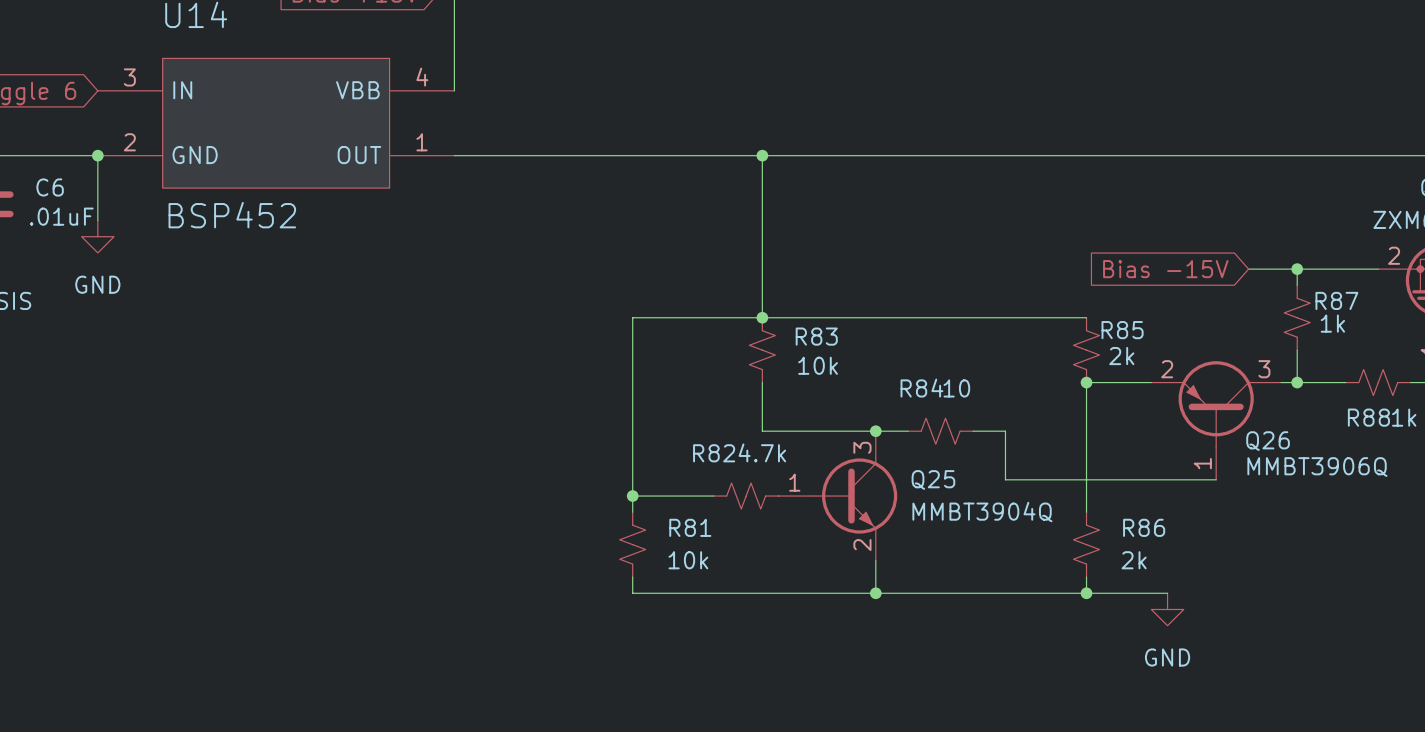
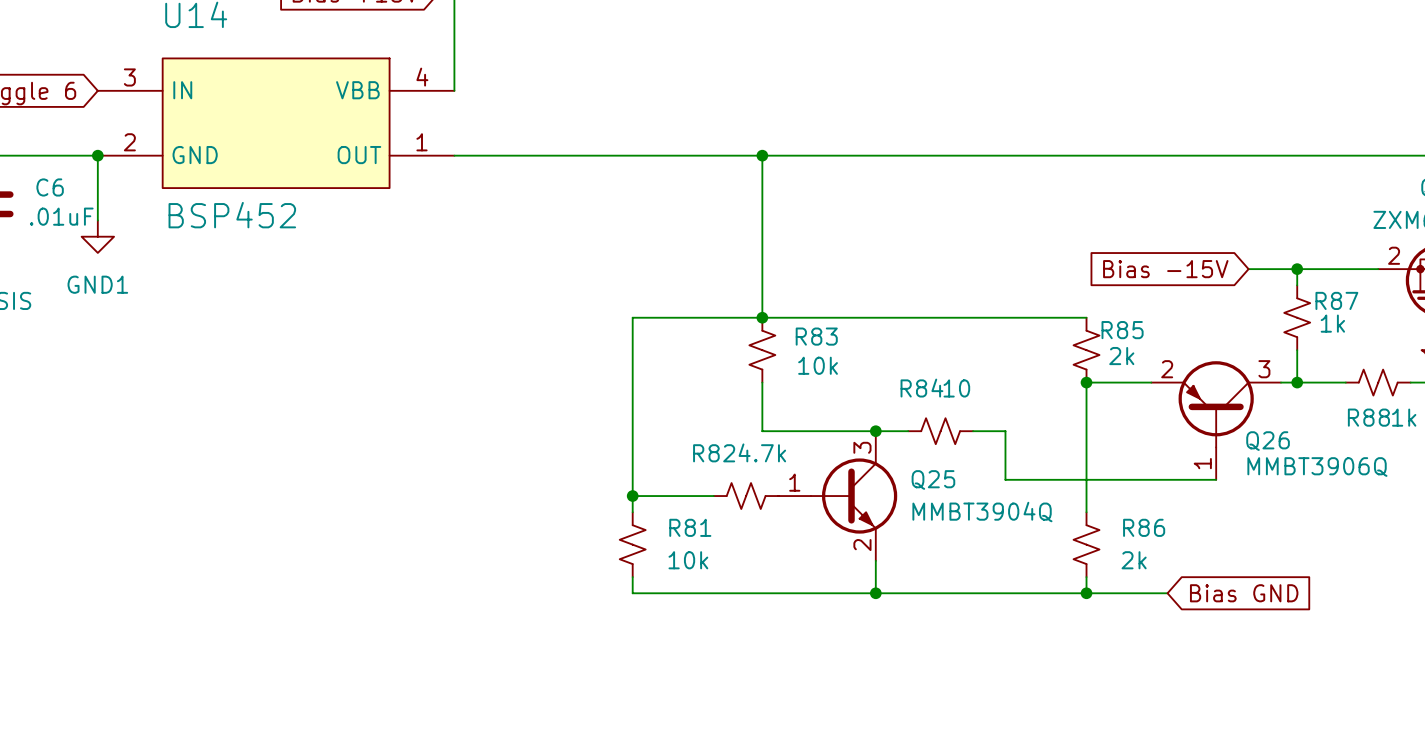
power symbol: GND (97, 236) -> GND1 (97, 236)
global label: none -> Bias GND (1244, 593)
power symbol: GND (1167, 609) -> none

